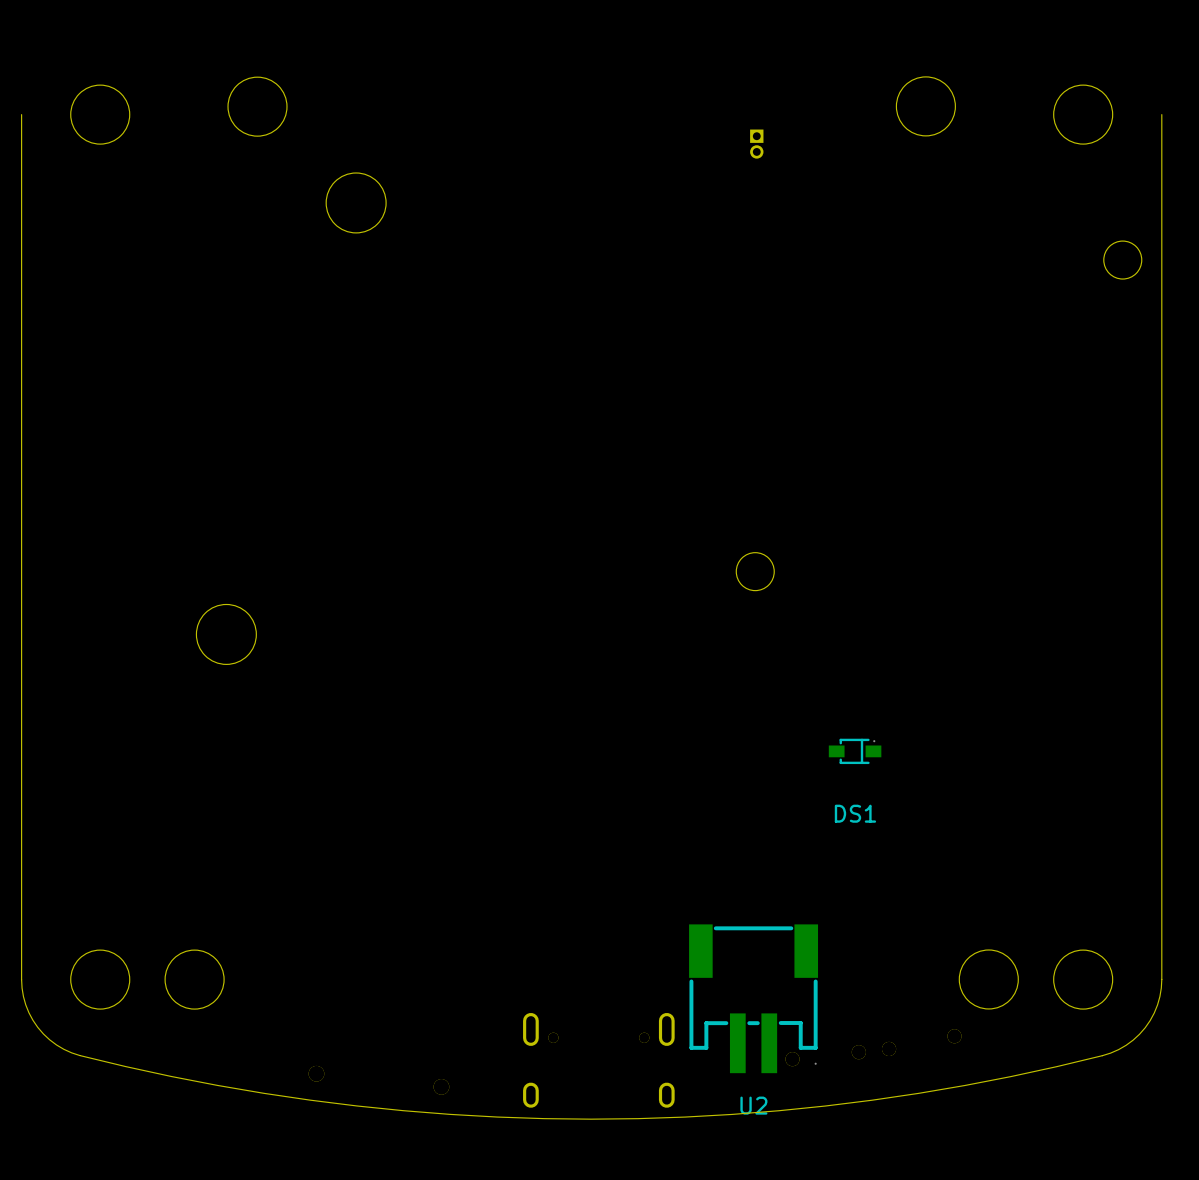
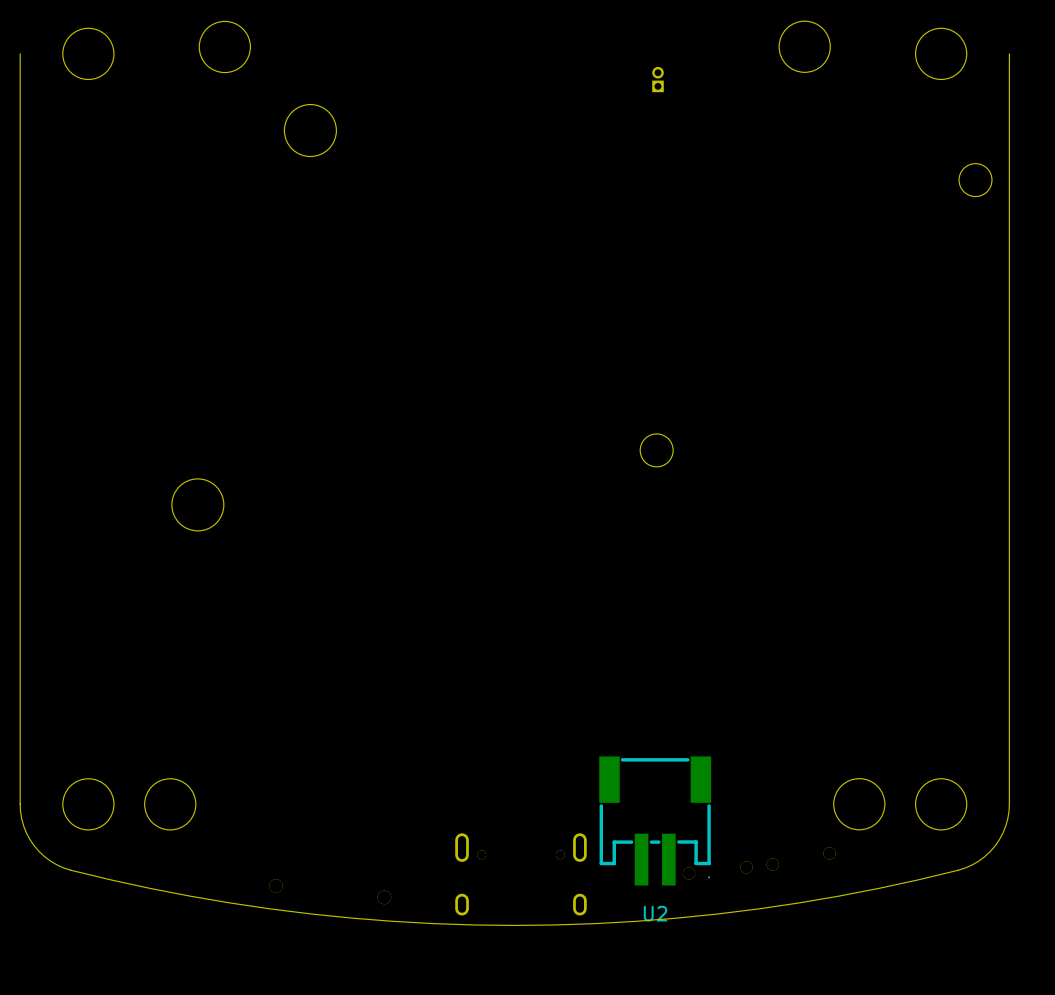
part rotation: 0° (756, 144) -> 180° (658, 79)
DS1: (855, 751) -> none

